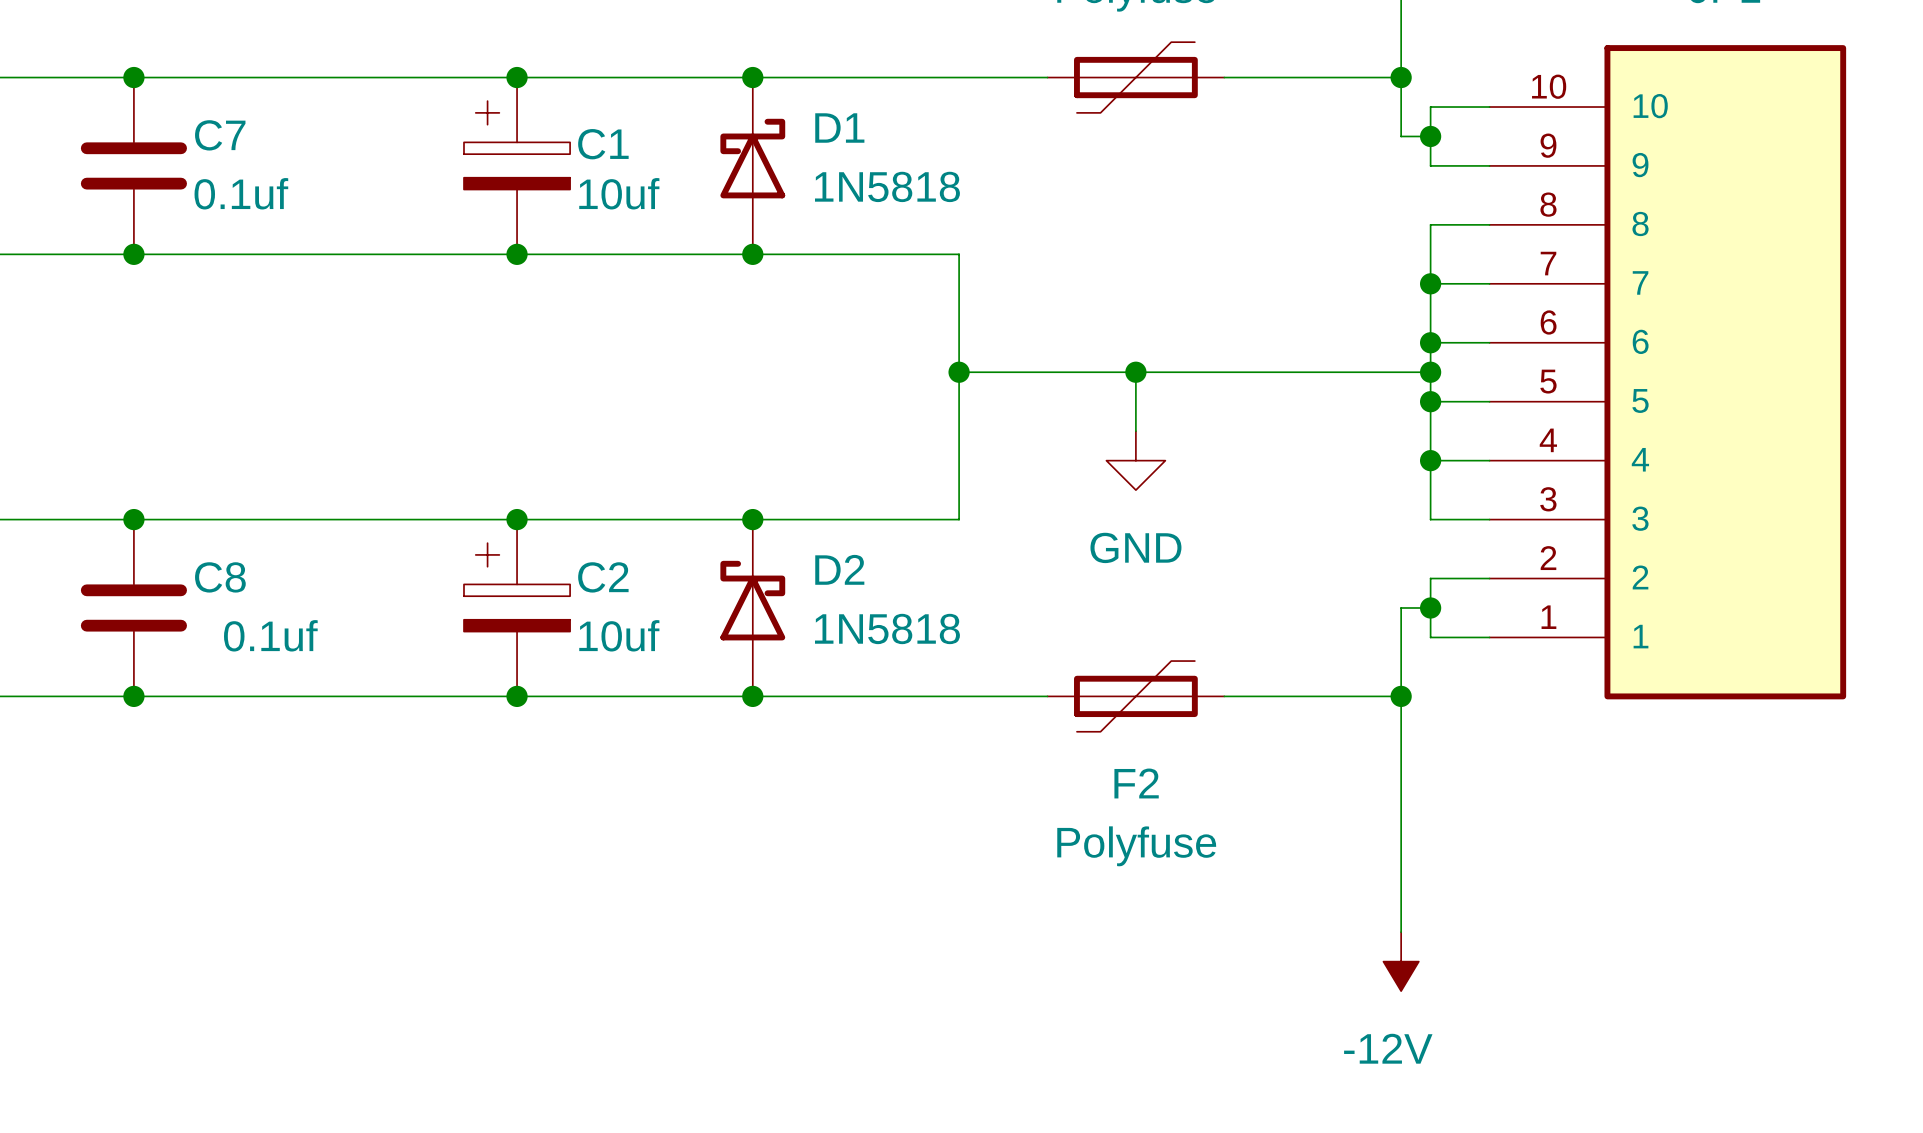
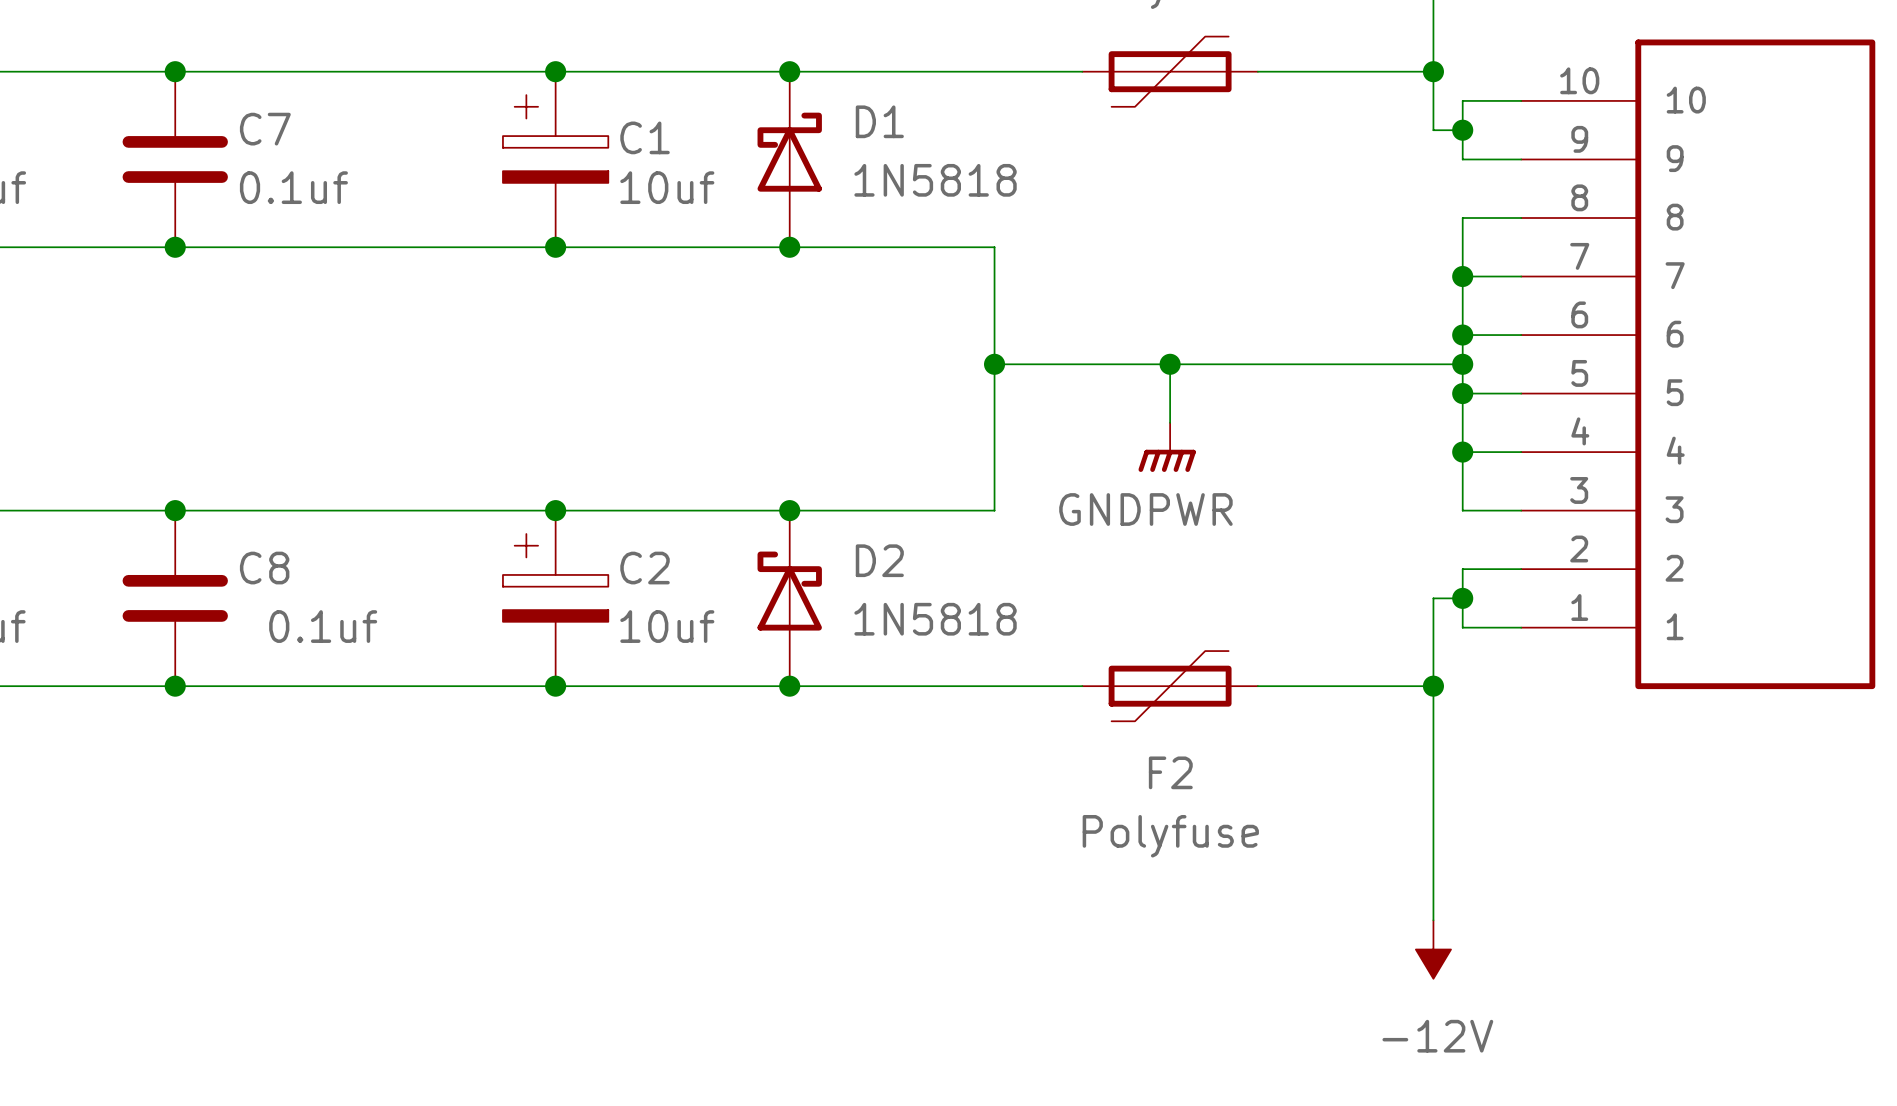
power symbol: GND (1135, 460) -> GNDPWR (1167, 447)

